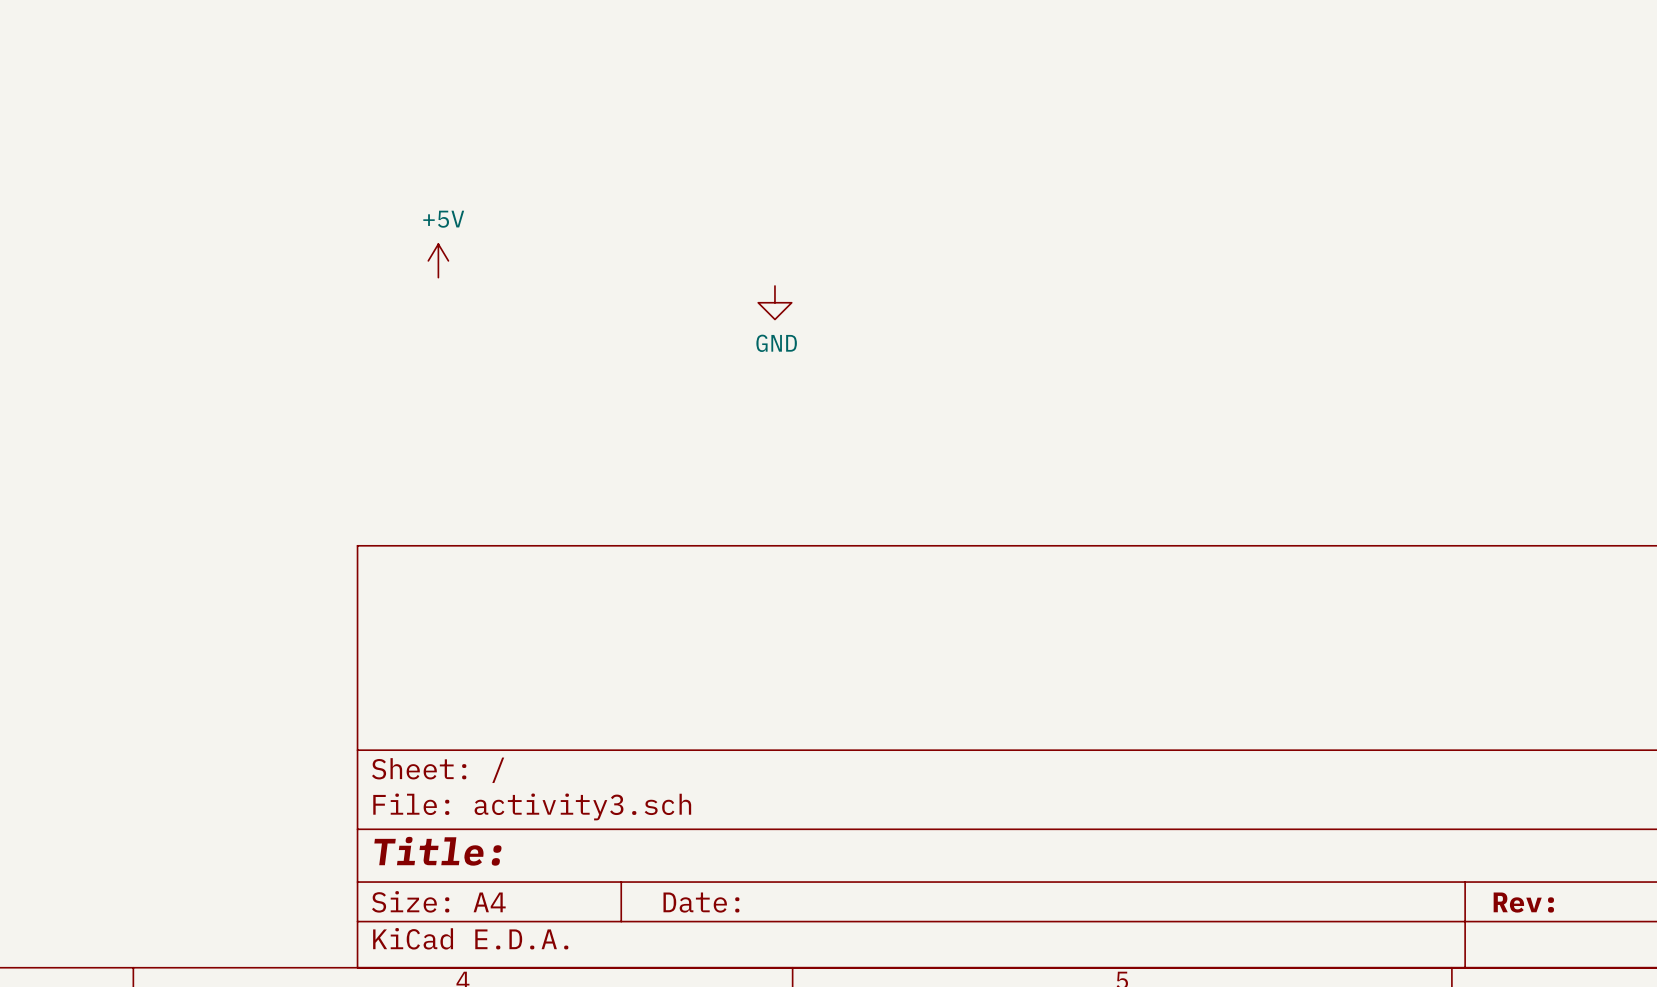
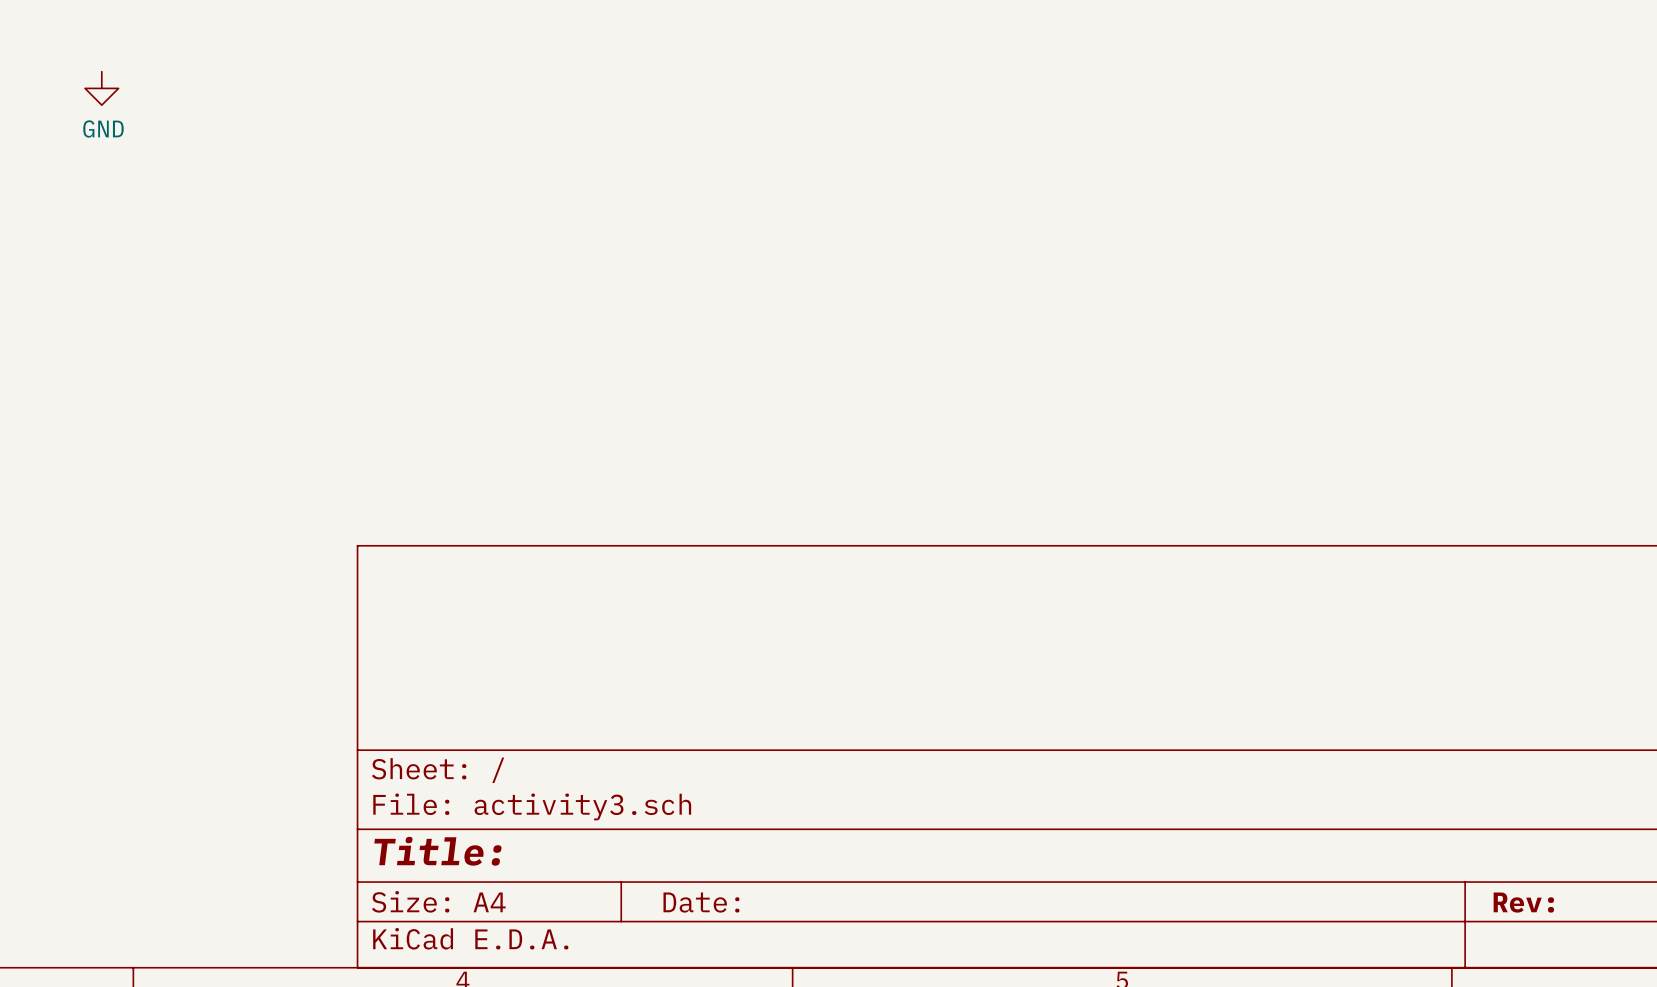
power symbol: none -> GND (101, 88)
power symbol: +5V (438, 260) -> none
power symbol: GND (774, 302) -> none

